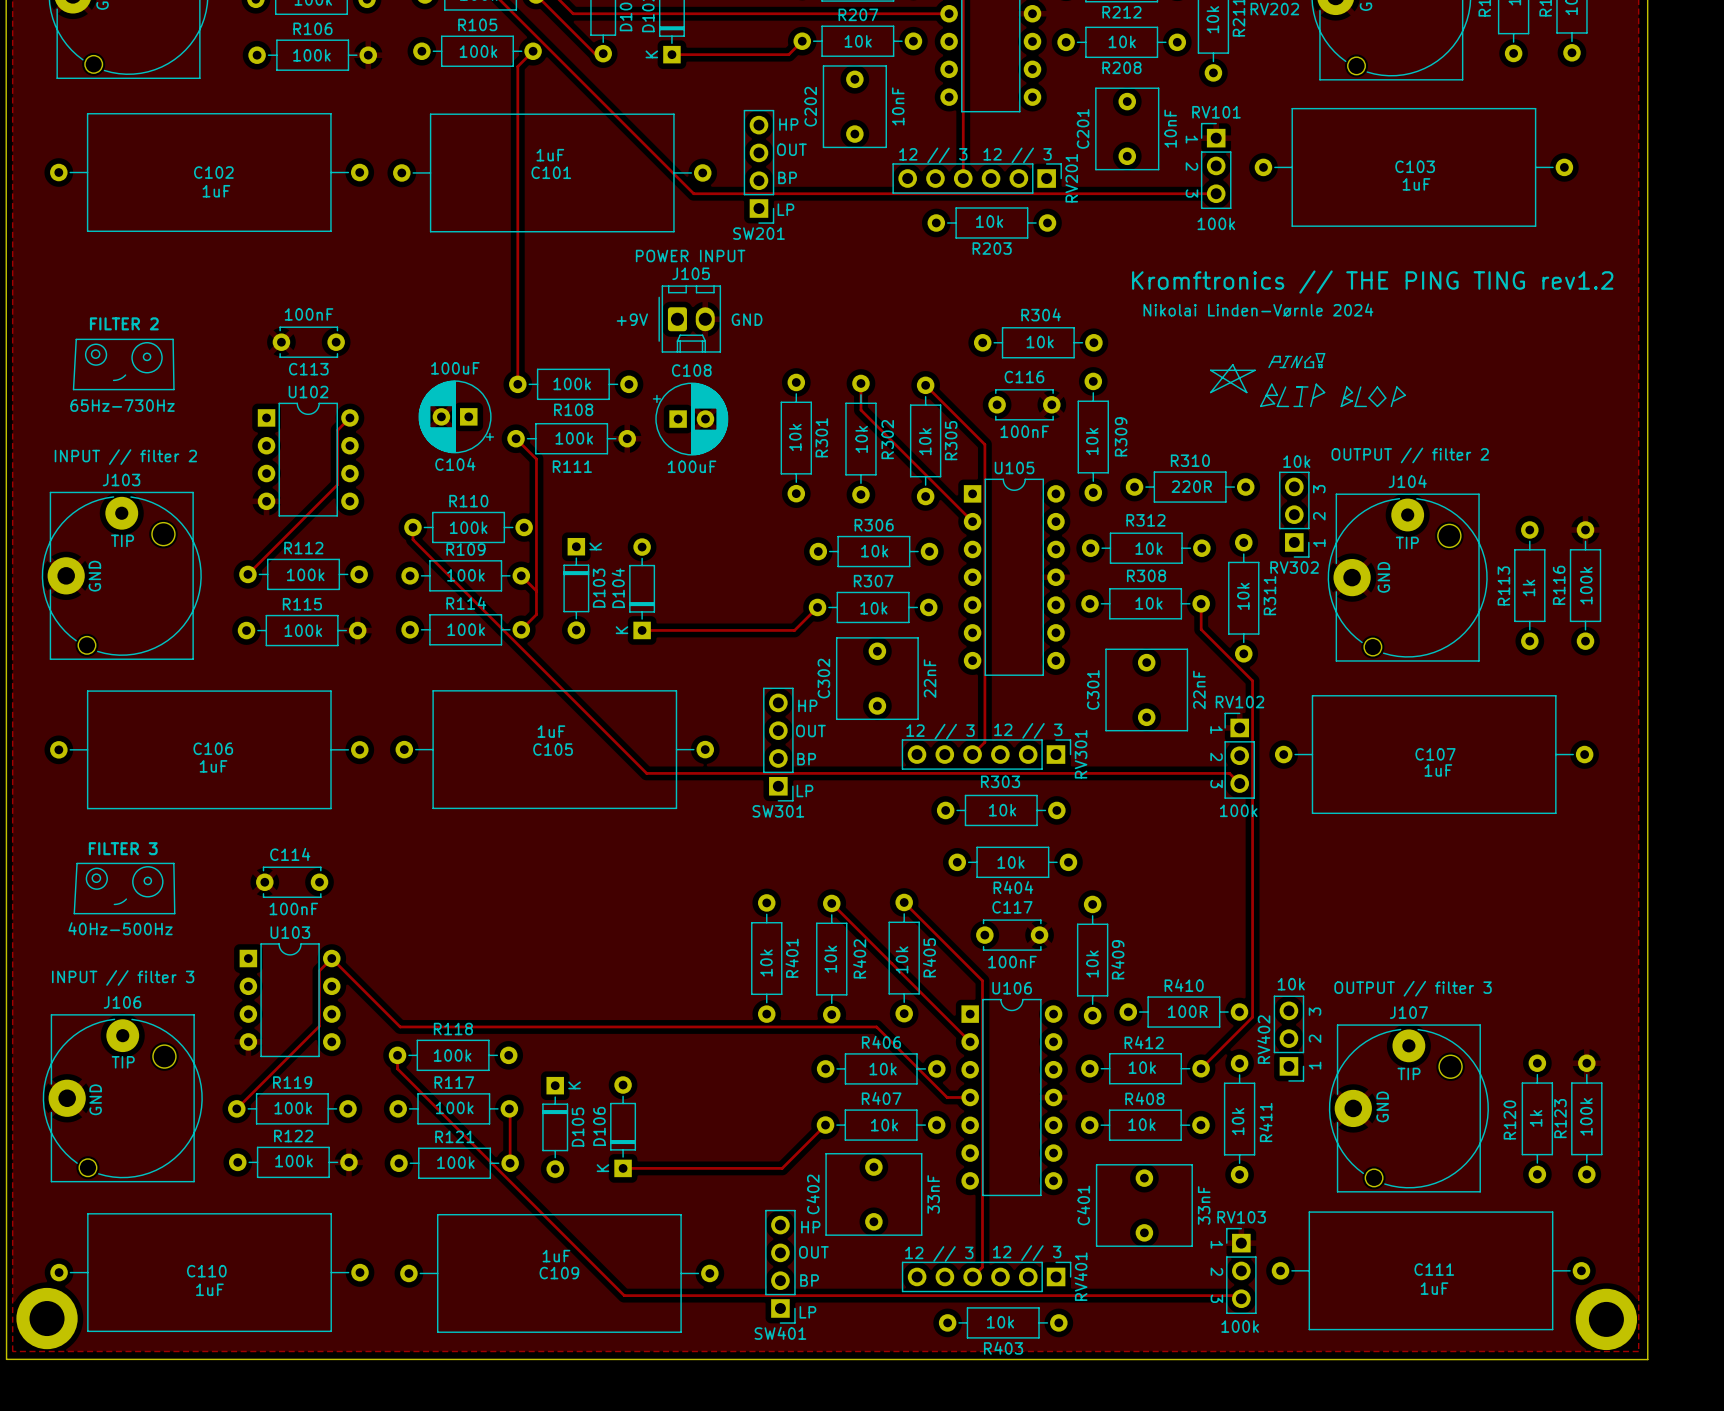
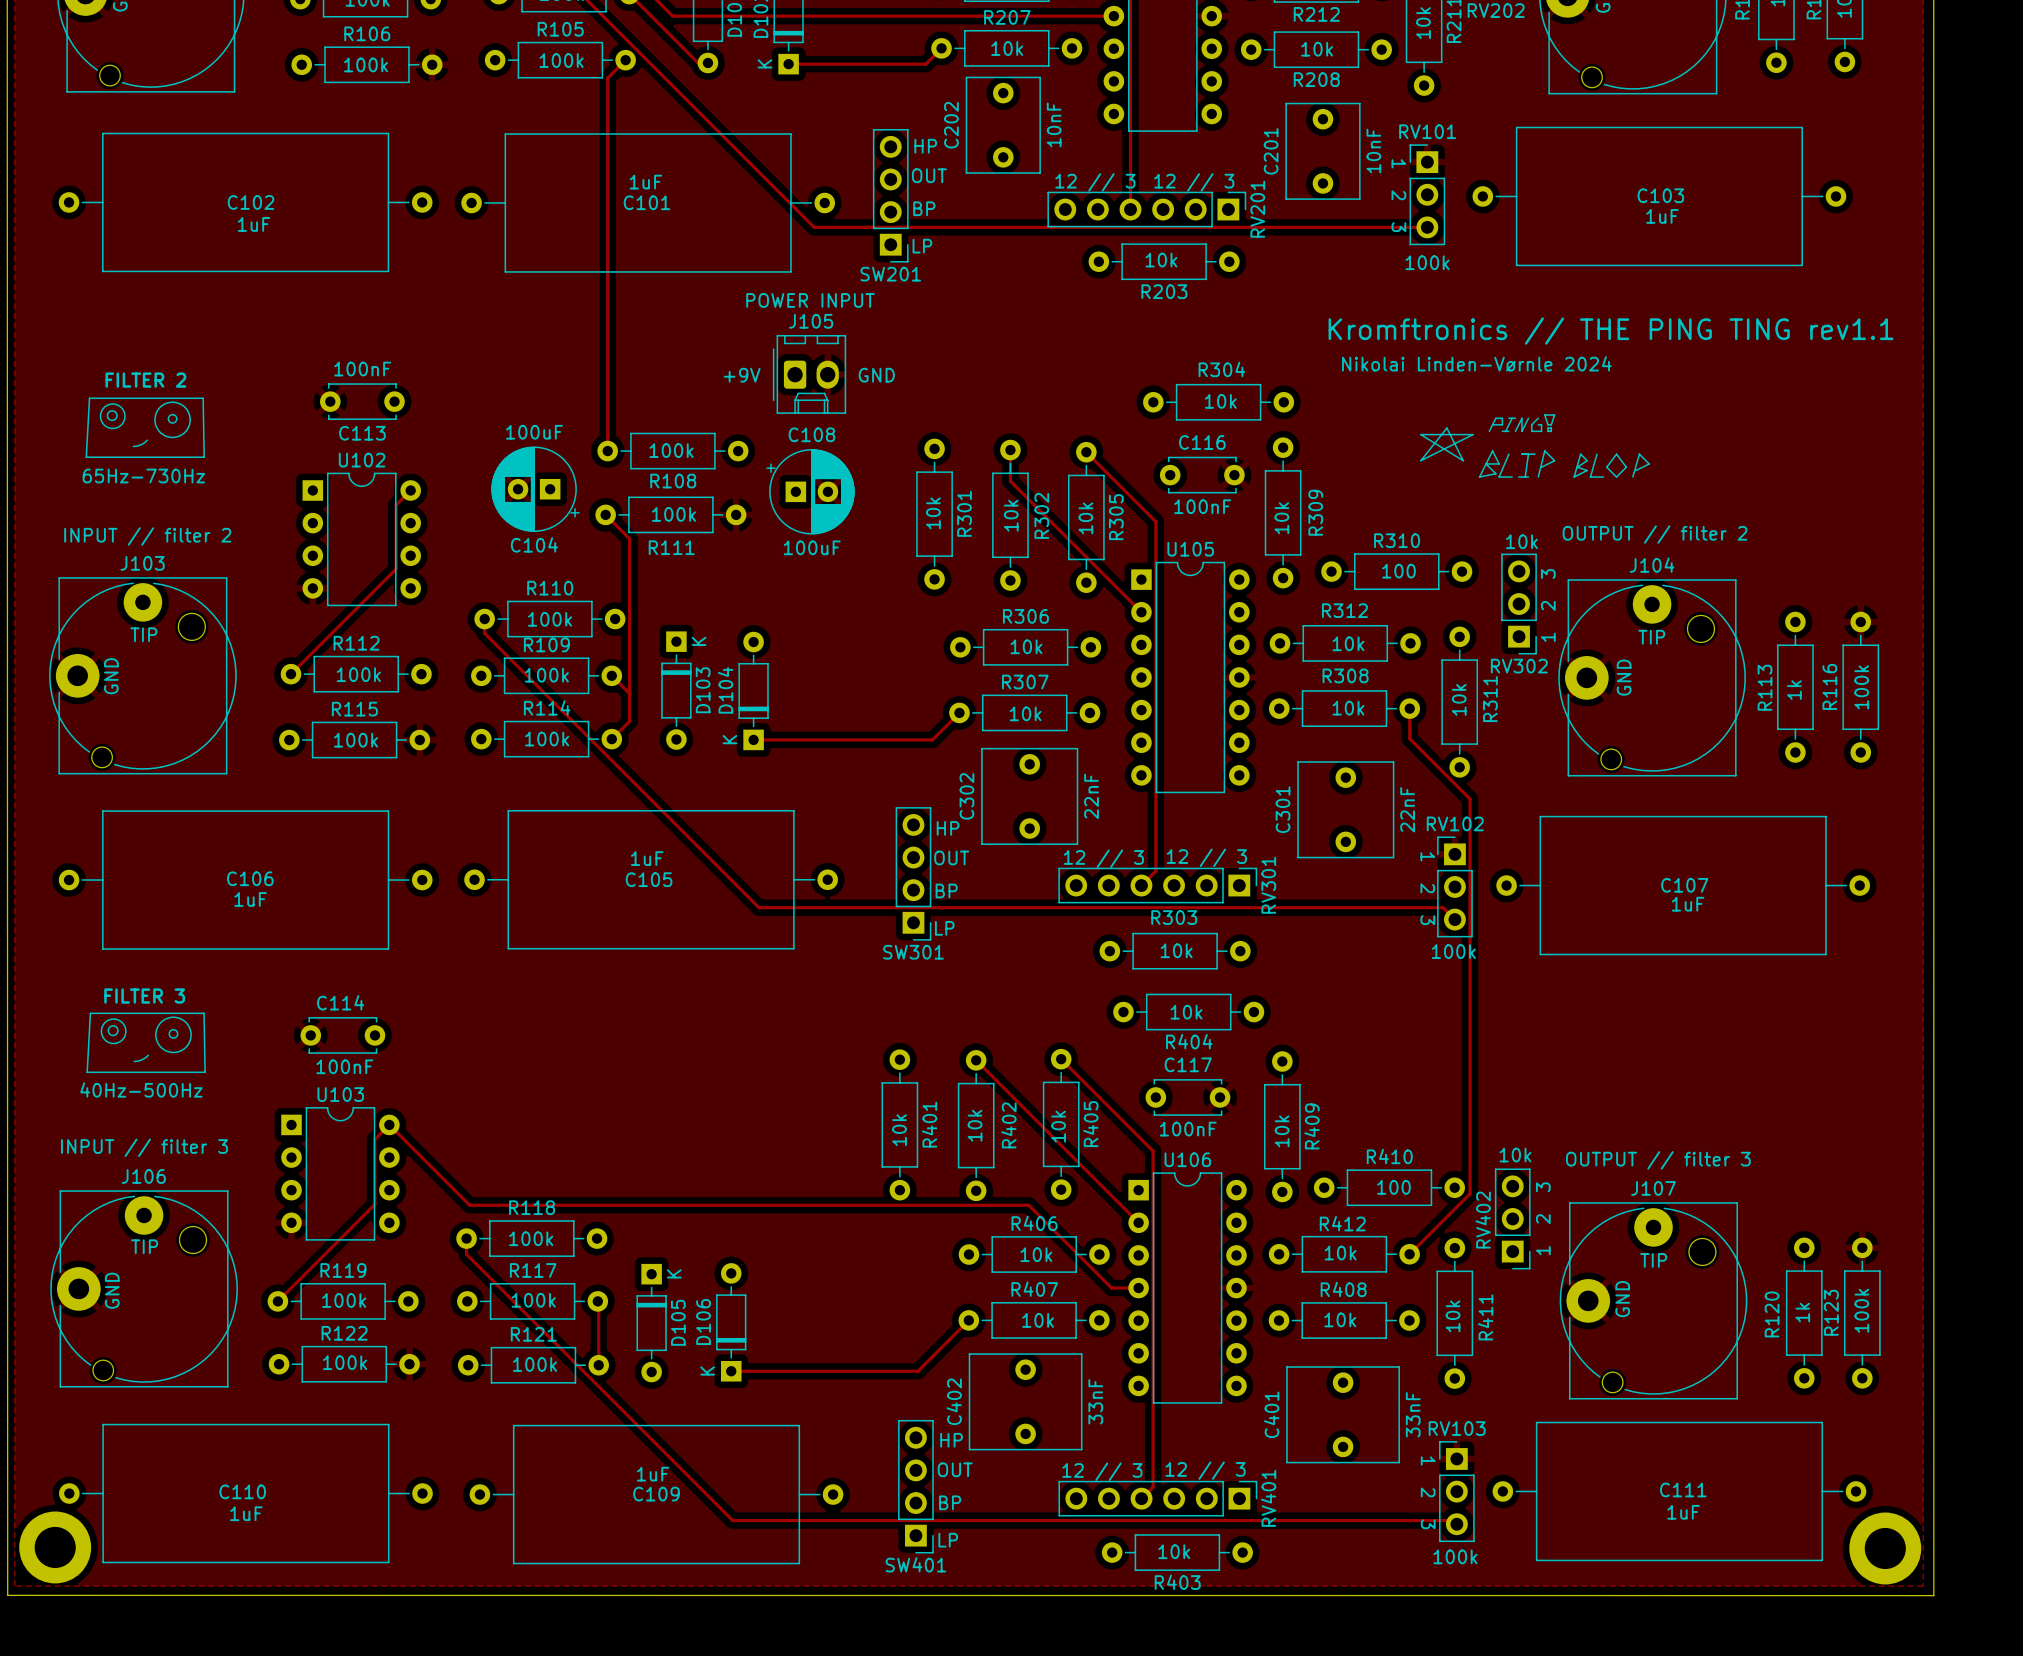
text: Kromftronics // THE PING TING rev1.2 (1372, 282) -> Kromftronics // THE PING TING rev1.1 (1611, 331)
R310 value: 220R (1191, 486) -> 100 (1398, 571)
R410 value: 100R (1187, 1011) -> 100 (1393, 1187)

